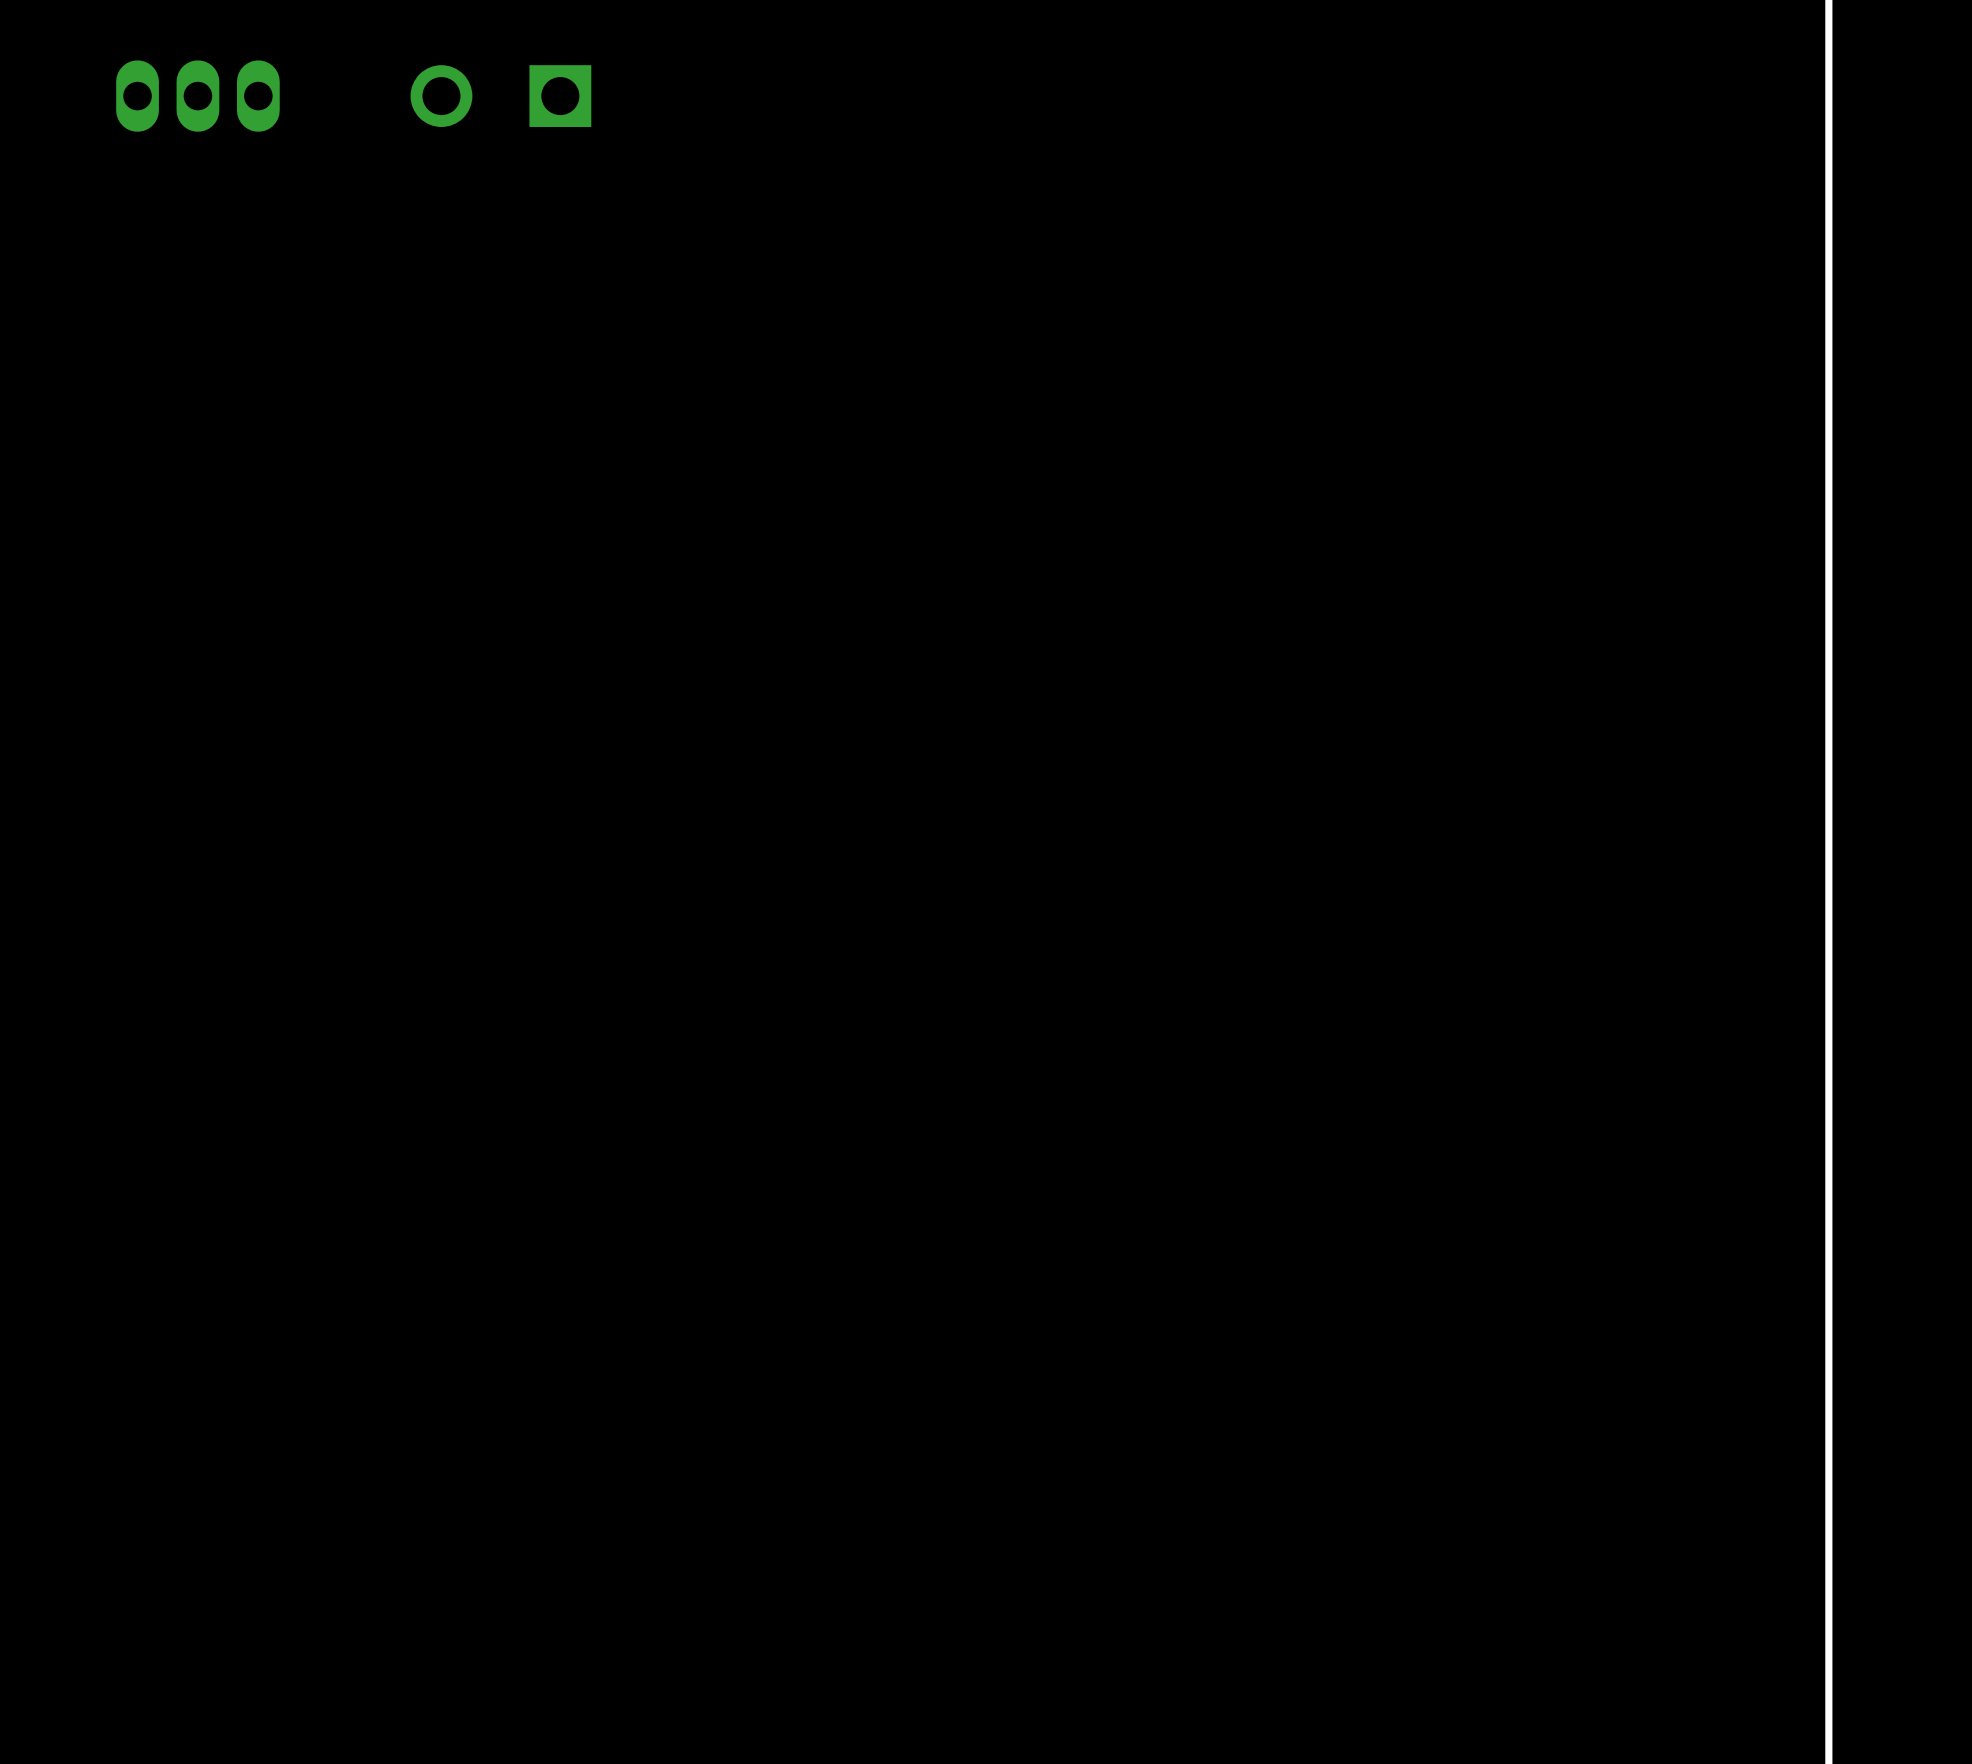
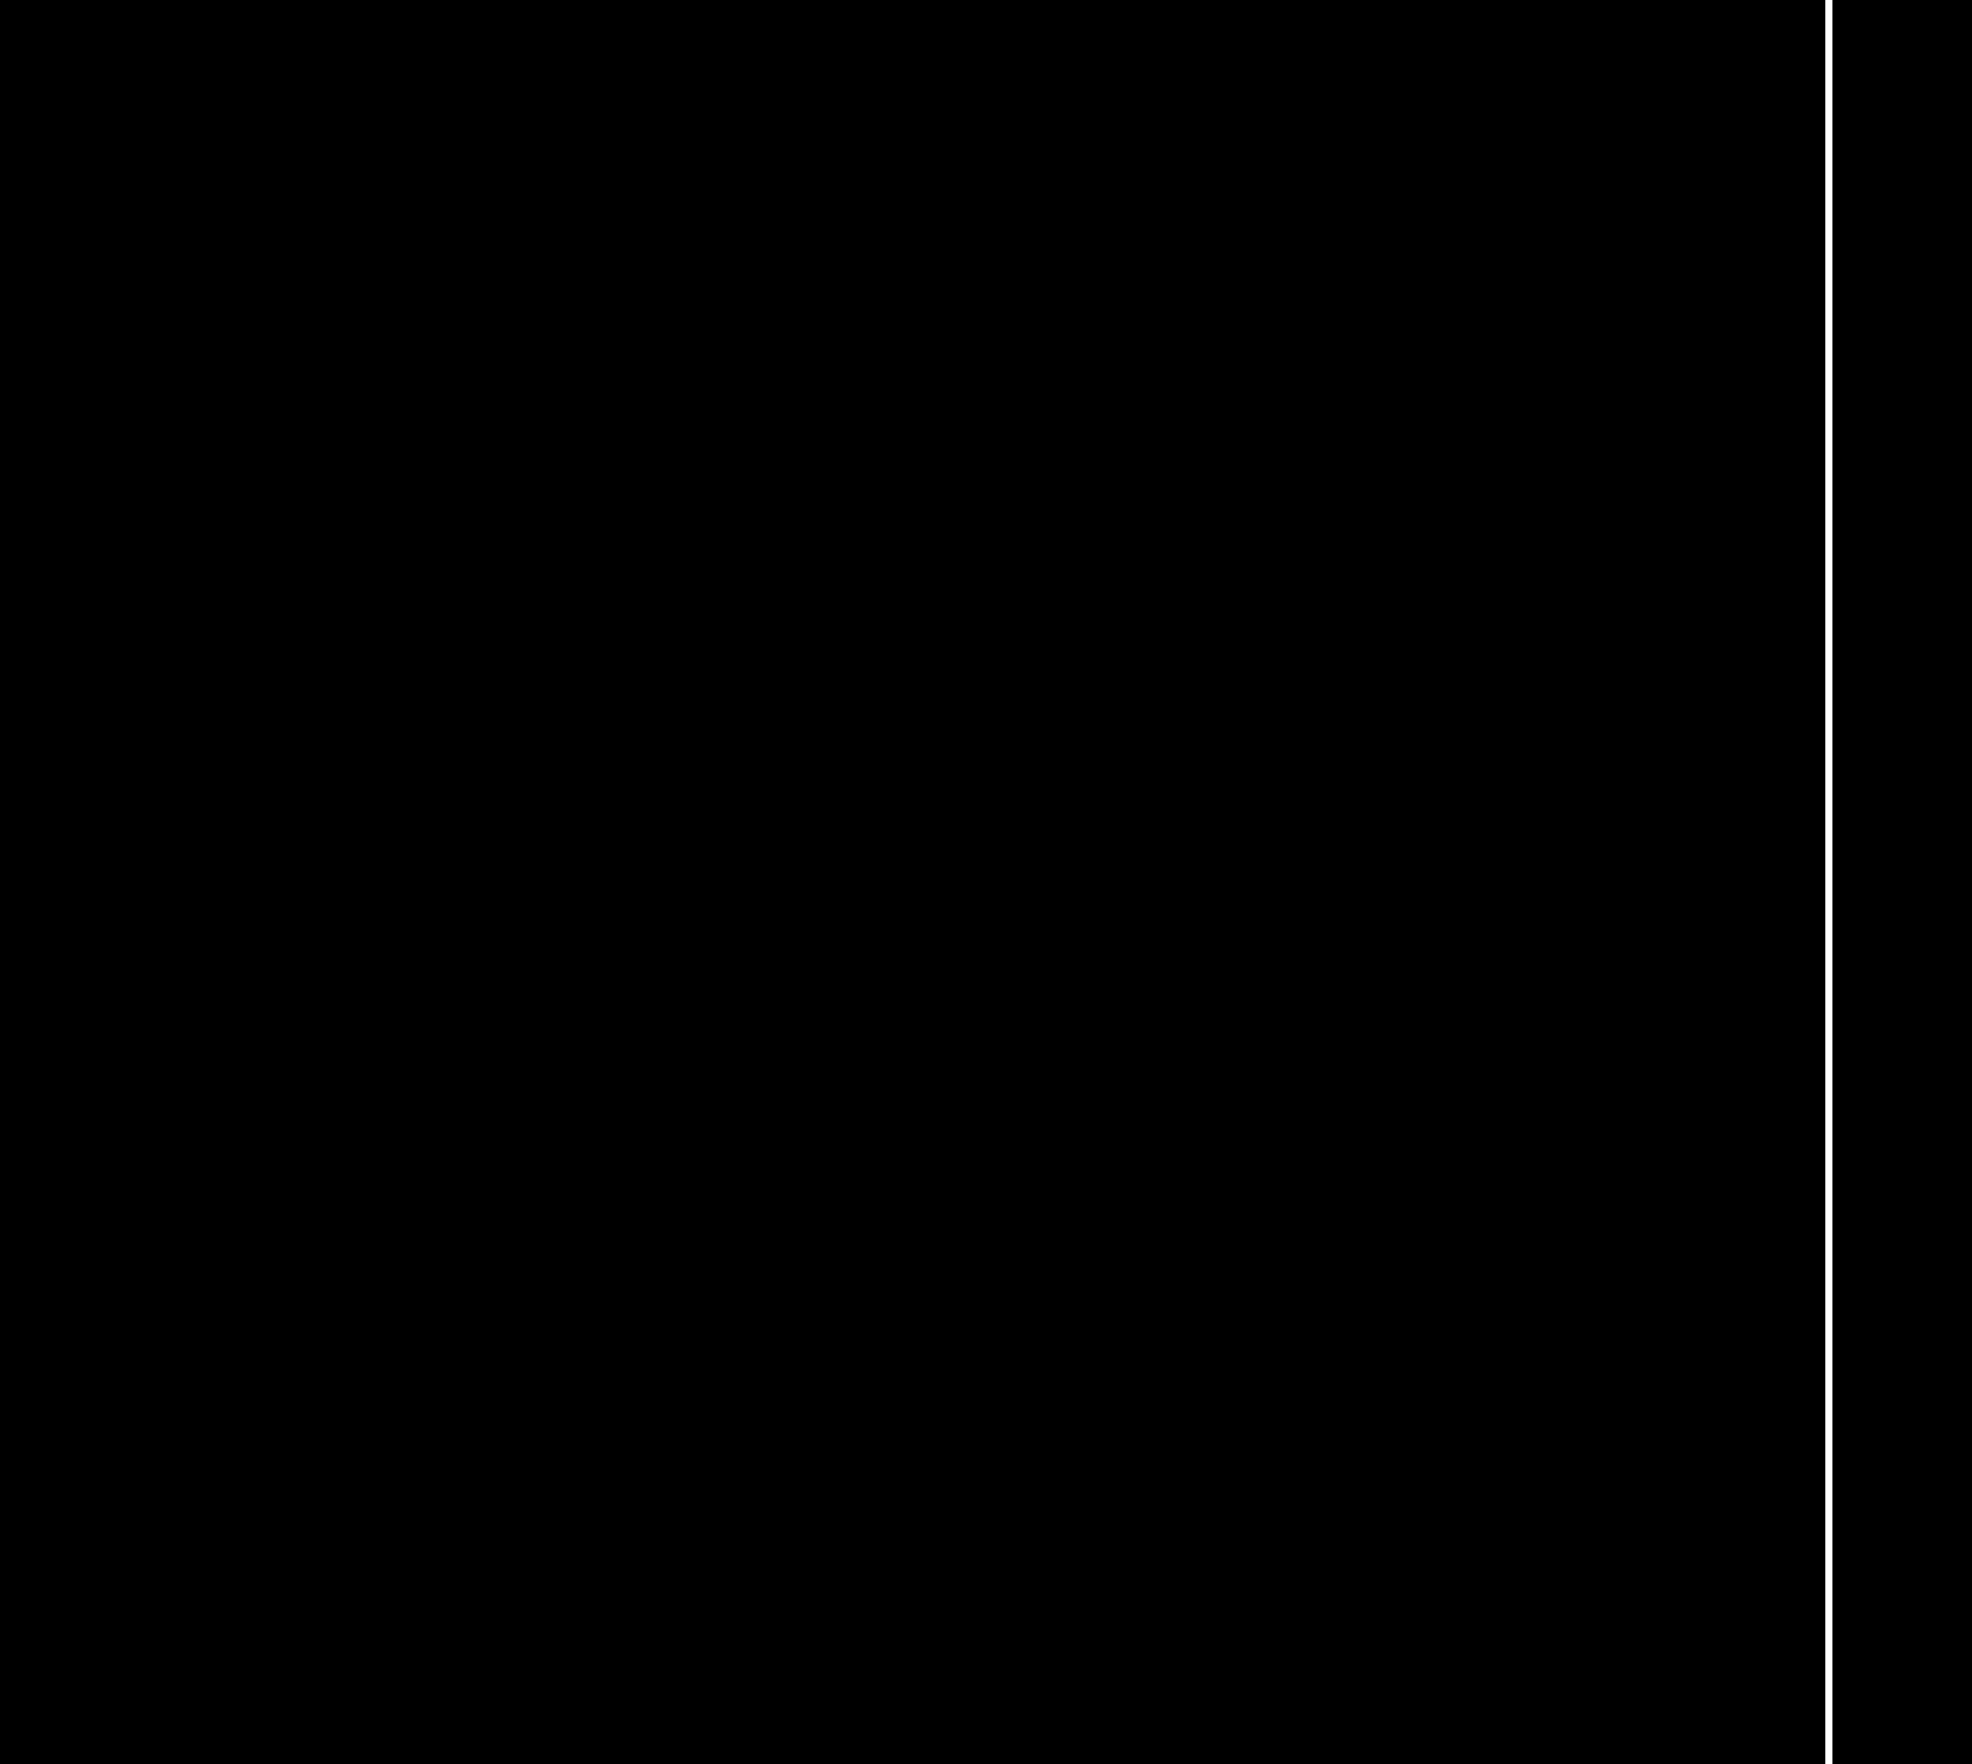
part: (197, 96) -> none
part: (500, 96) -> none

